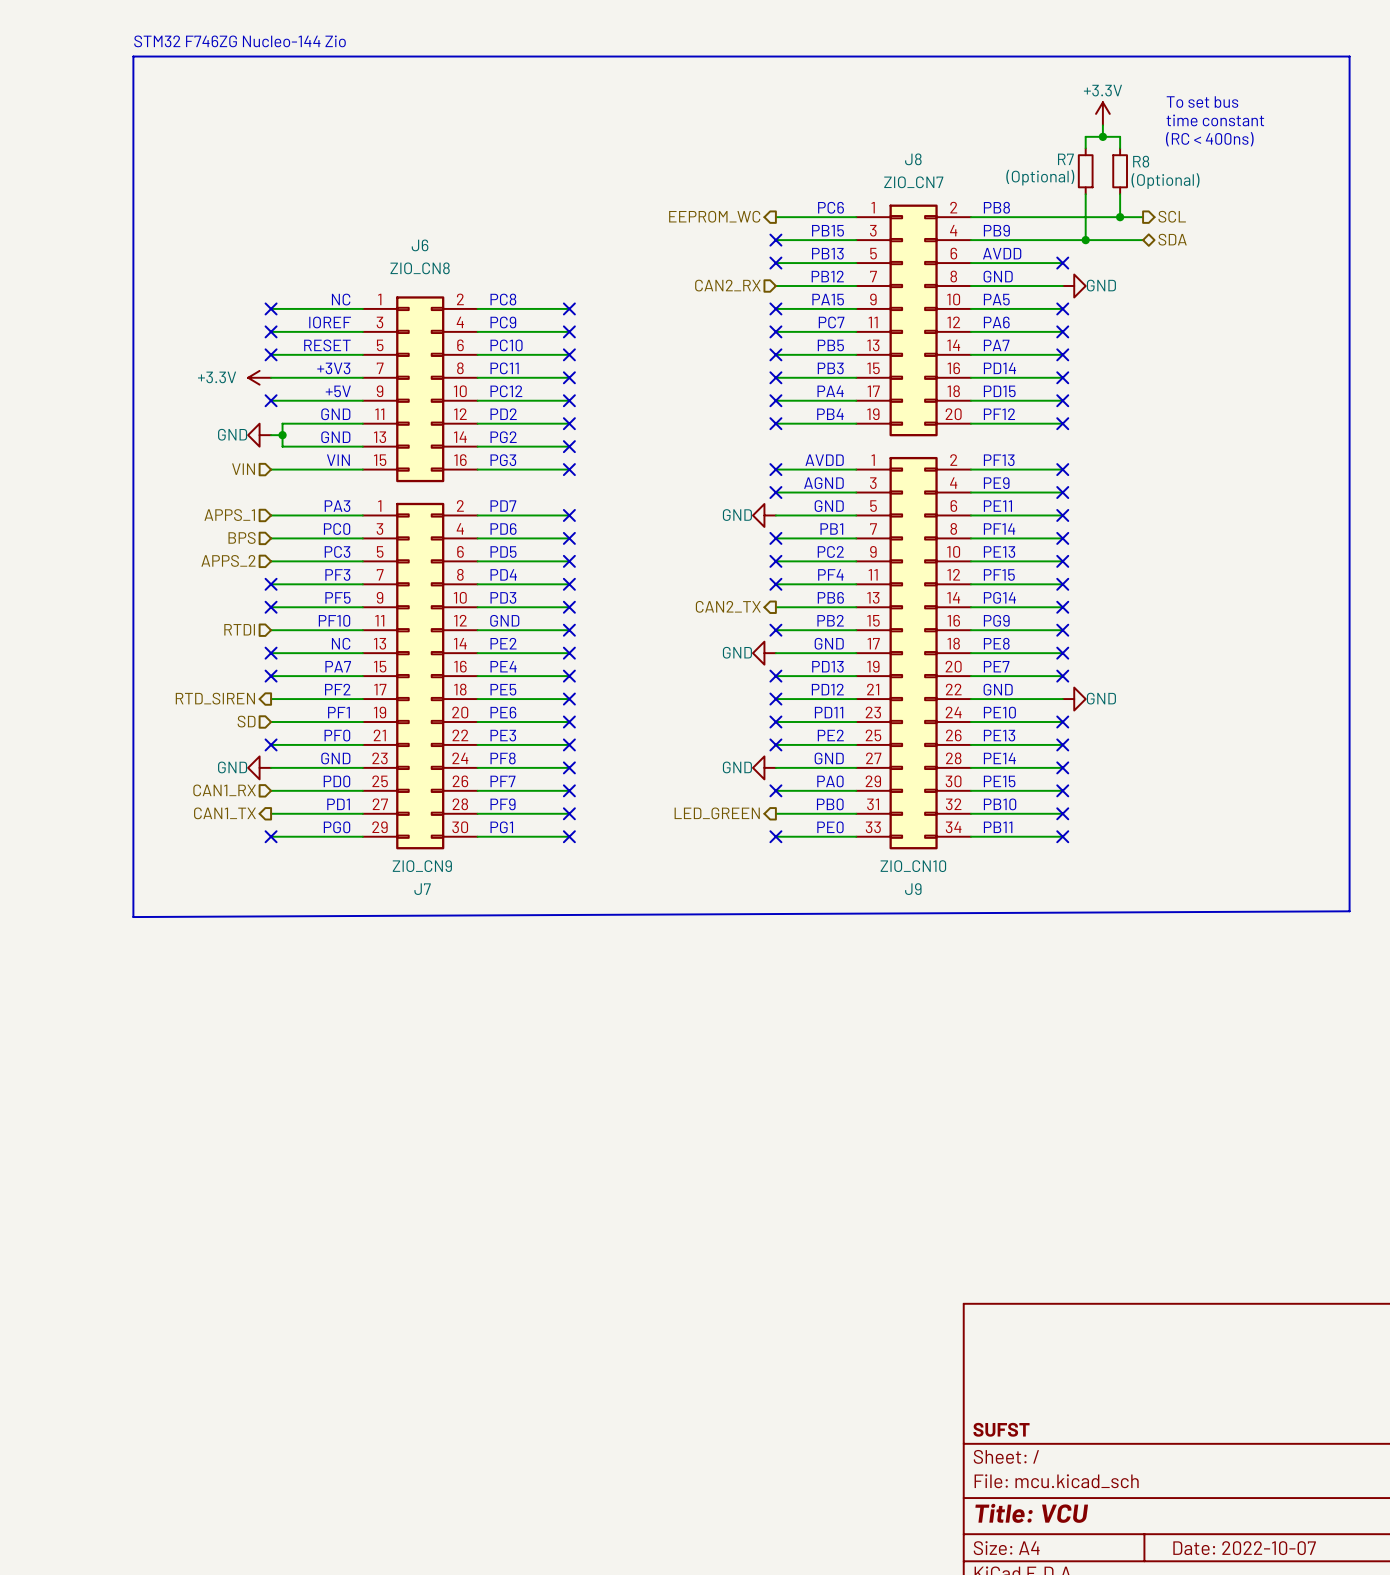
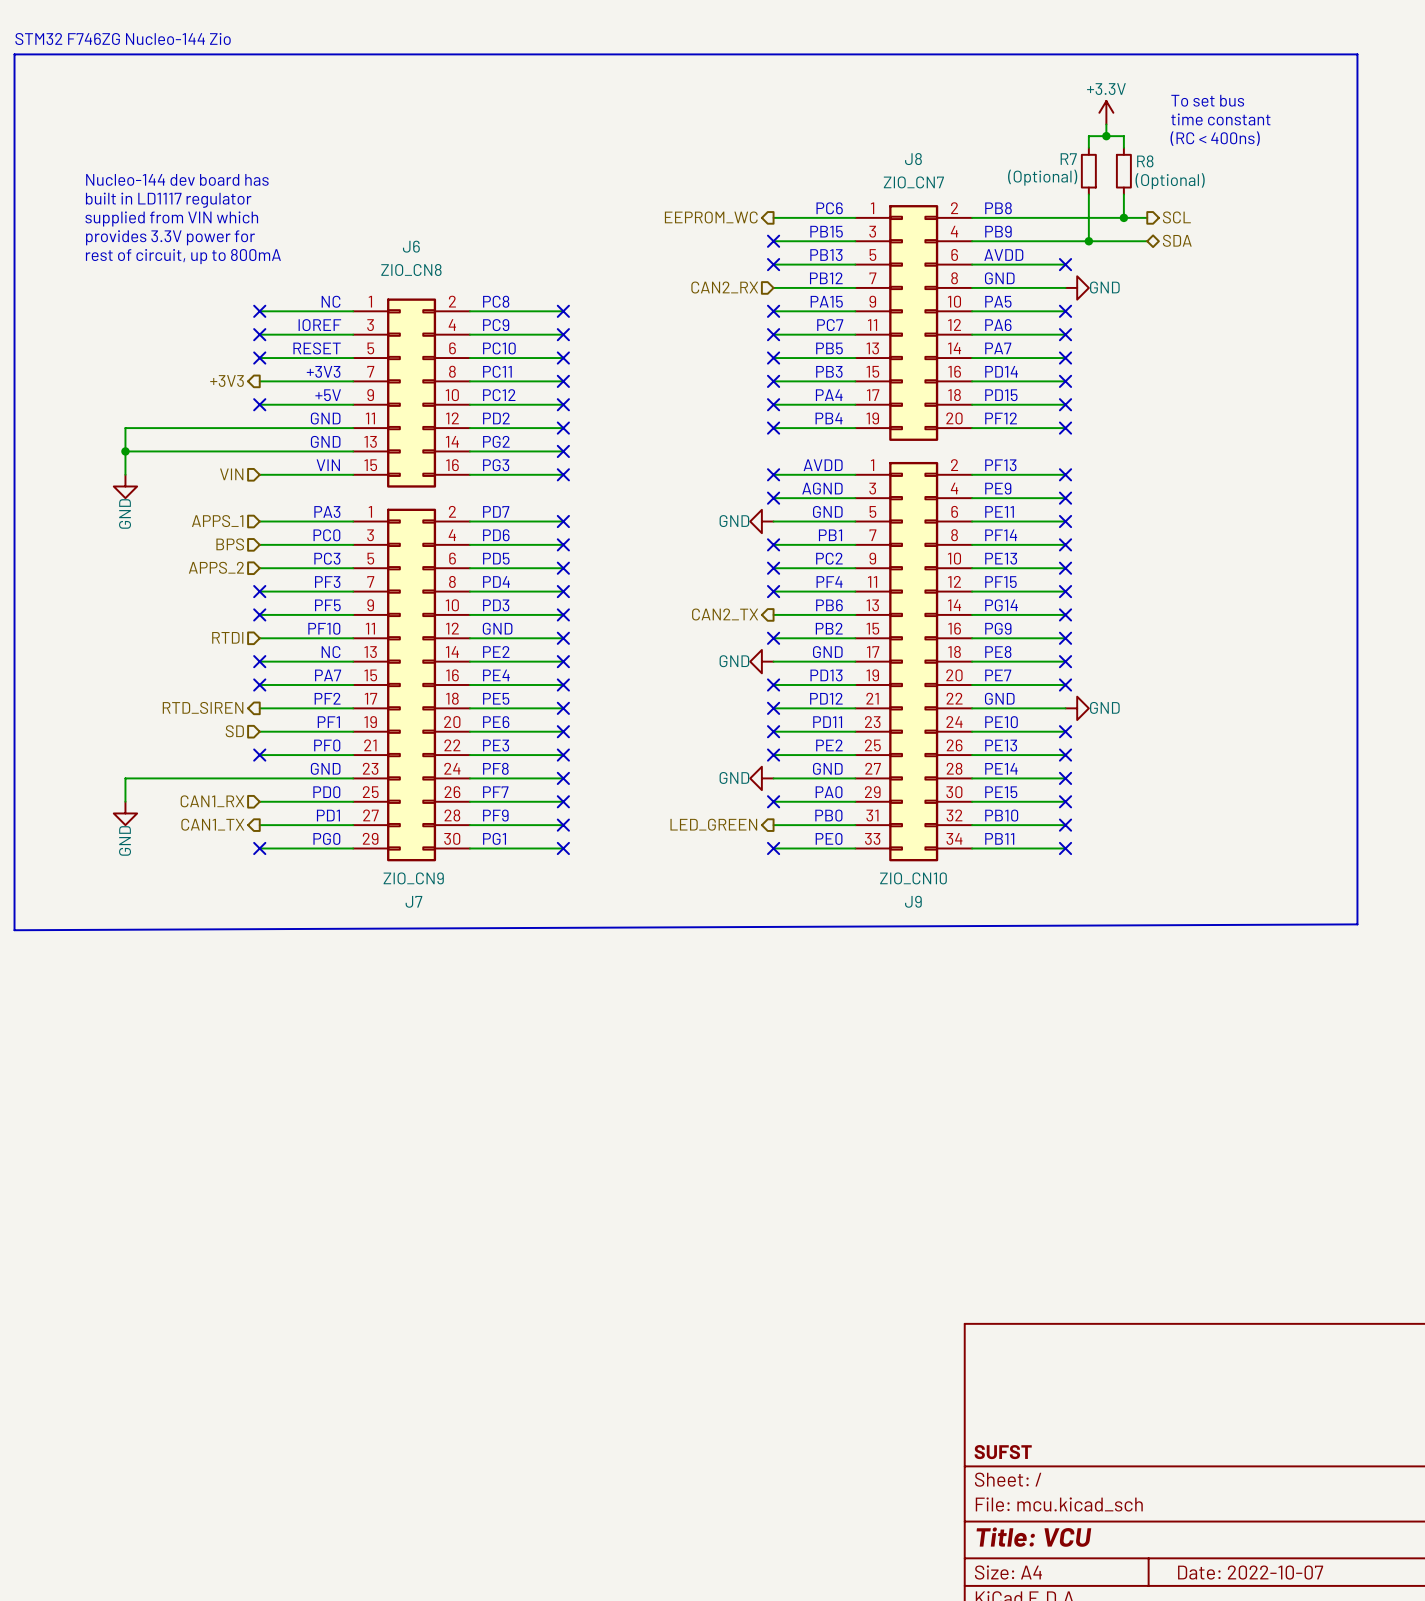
text position: STM32 F746ZG Nucleo-144 Zio (240, 41) -> STM32 F746ZG Nucleo-144 Zio (123, 38)
line: (133, 56) (133, 917) (1349, 911) -> (119, 54) (14, 54) (14, 930) (1357, 924)
text: none -> Nucleo-144 dev board has (177, 179)
text: none -> built in LD1117 regulator (168, 200)
text: none -> supplied from VIN which (171, 218)
text: none -> provides 3.3V power for (170, 237)
text: none -> rest of circuit, up to 800mA (183, 256)
hierarchical label: none -> +3V3 (227, 381)
power symbol: +3.3V (259, 377) -> none
wire: (282, 423) (282, 446) -> (271, 428) (125, 428) (125, 474)
power symbol rotation: 0° (259, 435) -> 90° counterclockwise (125, 486)
power symbol position: GND (259, 435) -> GND (125, 486)
wire: (271, 435) (282, 435) -> none
junction: (282, 435) -> none
wire: none -> (125, 451) (271, 451)
junction: none -> (125, 451)
power symbol rotation: 0° (259, 767) -> 90° counterclockwise (125, 813)
power symbol position: GND (259, 767) -> GND (125, 813)
wire: none -> (259, 778) (125, 778) (125, 801)

